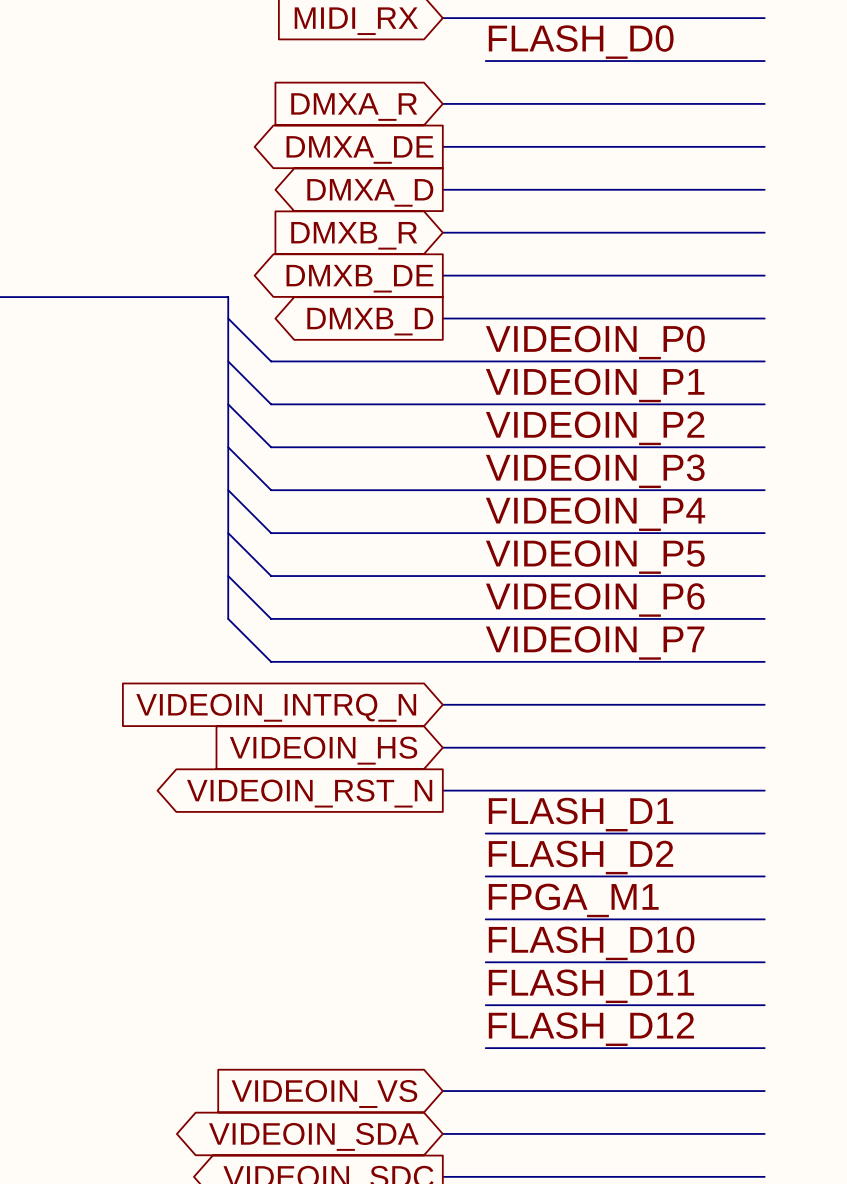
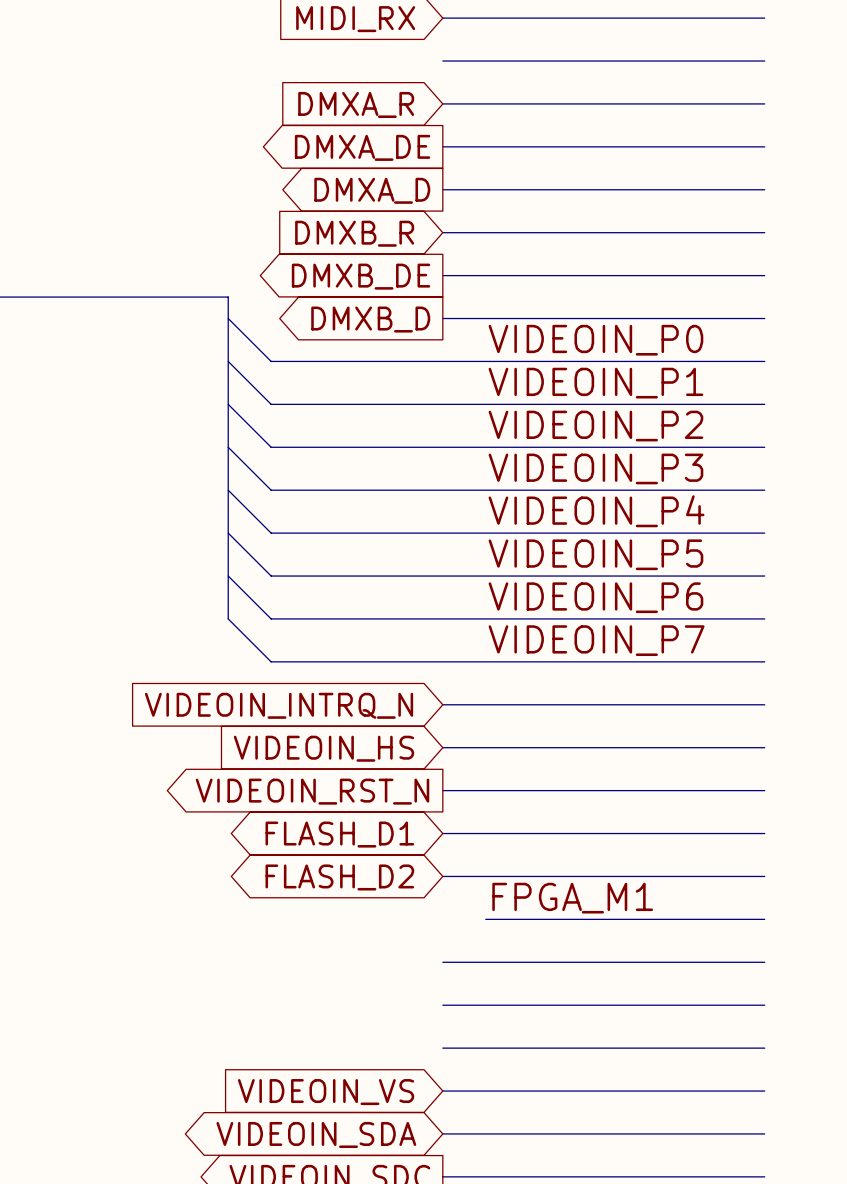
label: FLASH_D0 (581, 42) -> none
wire: none -> (442, 61) (485, 61)
label: FLASH_D1 (581, 814) -> none
wire: none -> (442, 833) (485, 833)
global label: none -> FLASH_D1 (339, 834)
label: FLASH_D2 (580, 857) -> none
wire: none -> (442, 876) (485, 876)
global label: none -> FLASH_D2 (339, 877)
label: FLASH_D10 (591, 943) -> none
wire: none -> (442, 962) (485, 962)
label: FLASH_D11 (591, 986) -> none
wire: none -> (442, 1005) (485, 1005)
label: FLASH_D12 (591, 1029) -> none
wire: none -> (442, 1048) (485, 1048)

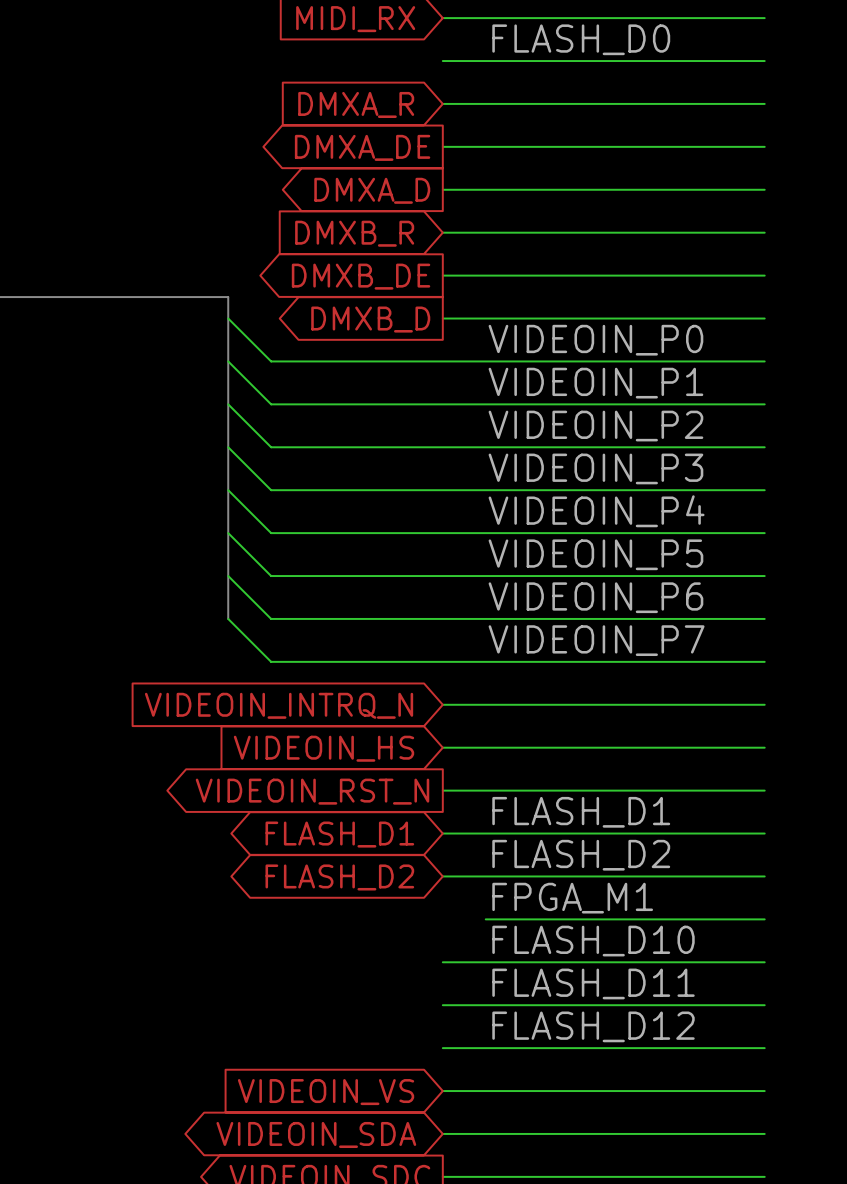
label: none -> FLASH_D0 (581, 39)
label: none -> FLASH_D1 (581, 812)
label: none -> FLASH_D2 (581, 855)
label: none -> FLASH_D10 (593, 941)
label: none -> FLASH_D11 (593, 983)
label: none -> FLASH_D12 (593, 1026)

